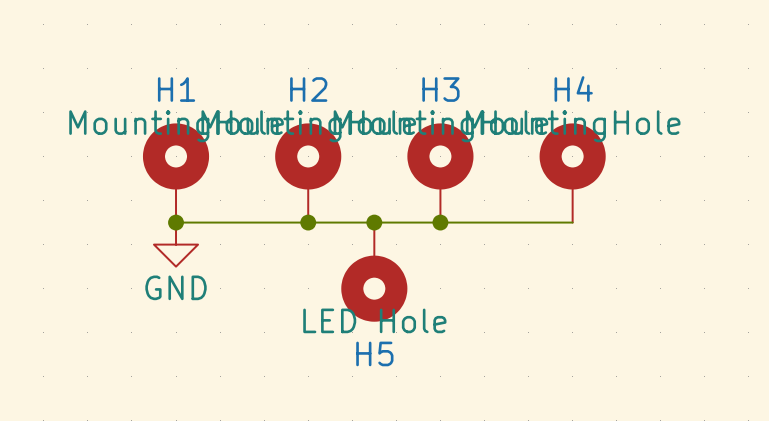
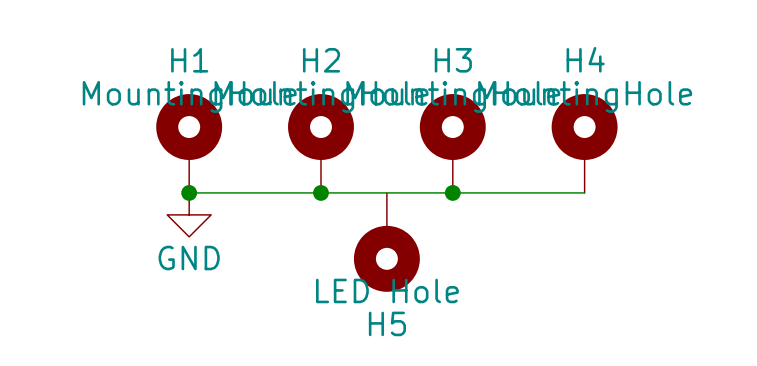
junction: (374, 222) -> none

